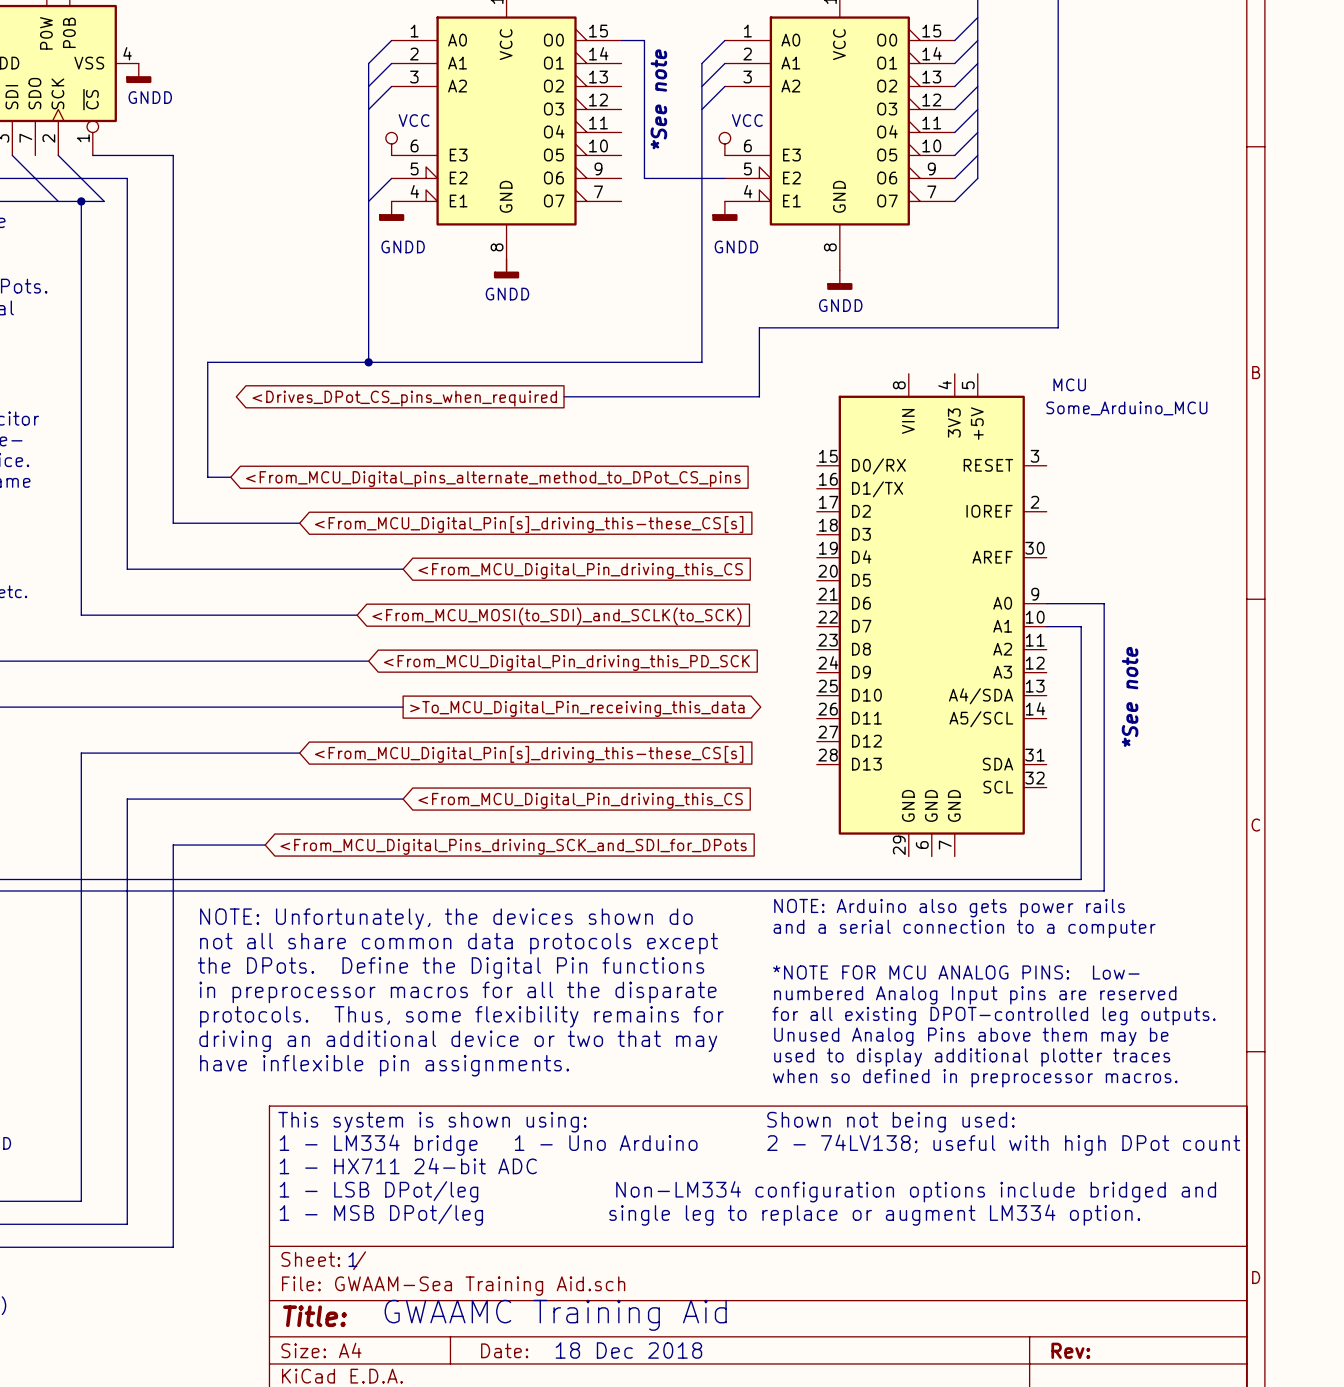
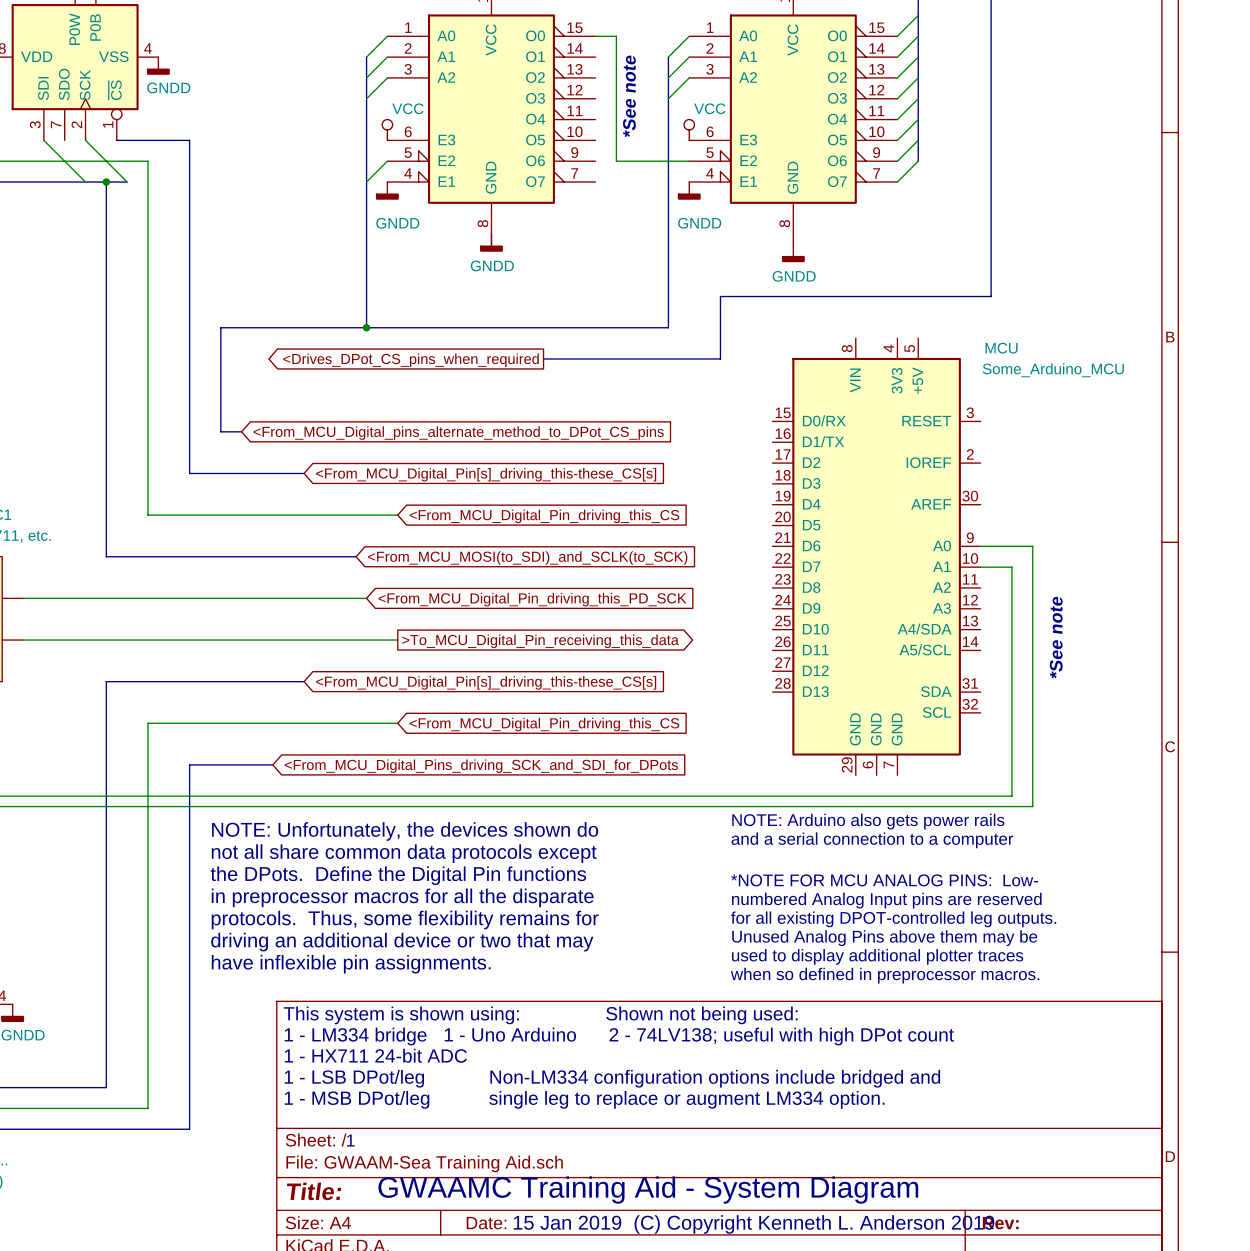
text: GWAAMC Training Aid (555, 1315) -> GWAAMC Training Aid - System Diagram (648, 1190)
text: 18 Dec 2018 (628, 1350) -> none
text: none -> 15 Jan 2019 (C) Copyright Kenneth L. Anderson 2019 (754, 1224)

